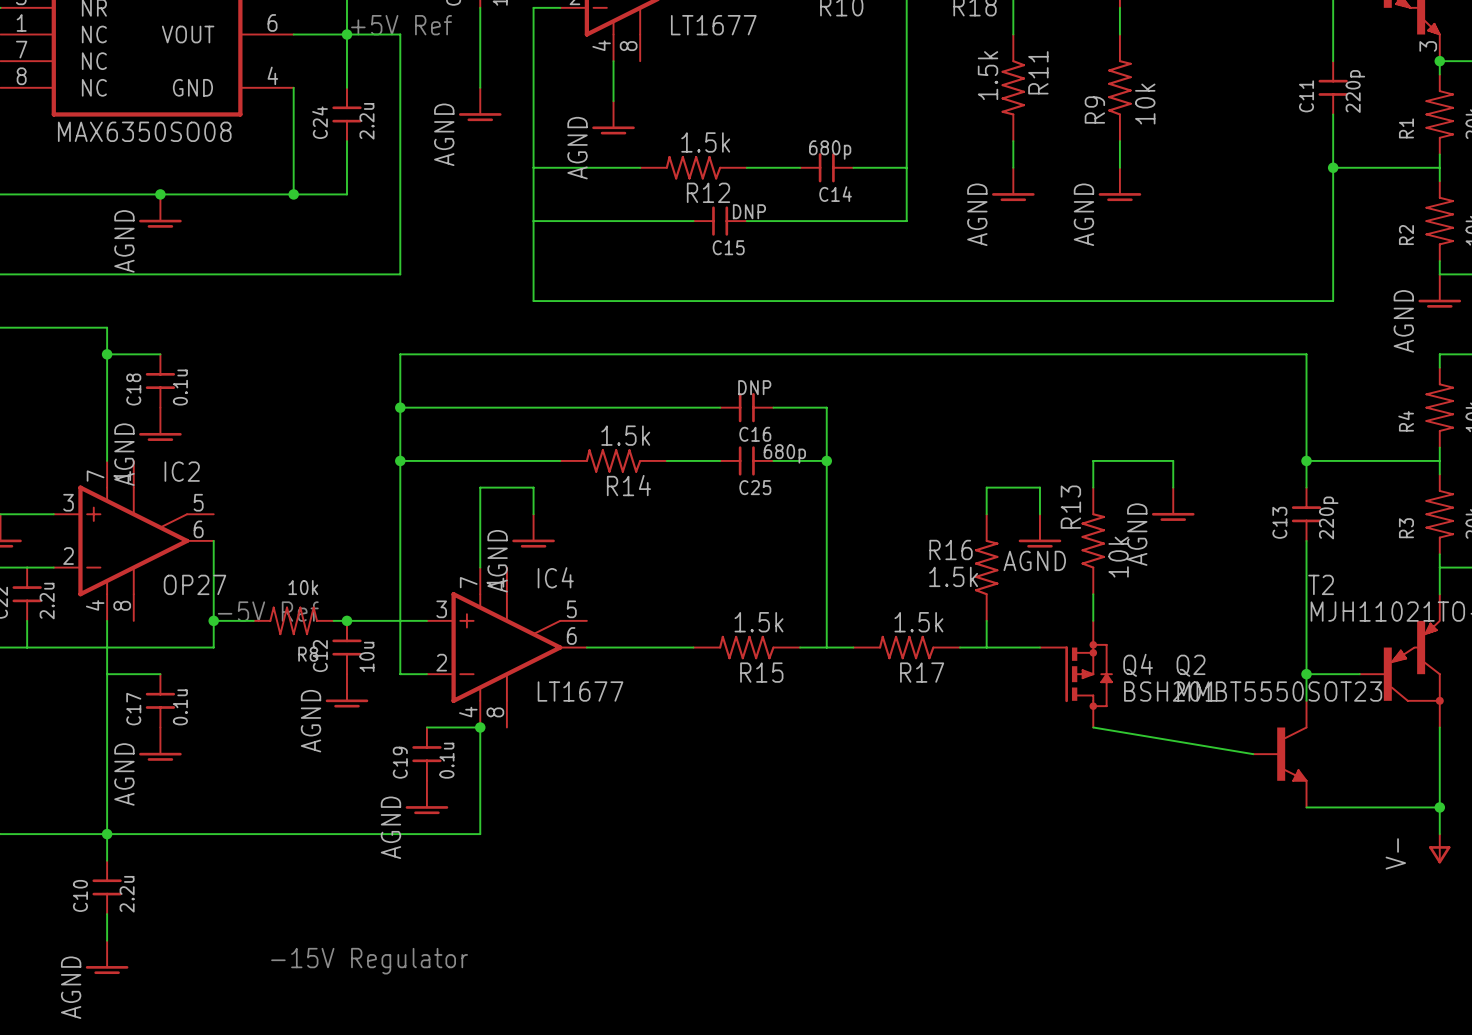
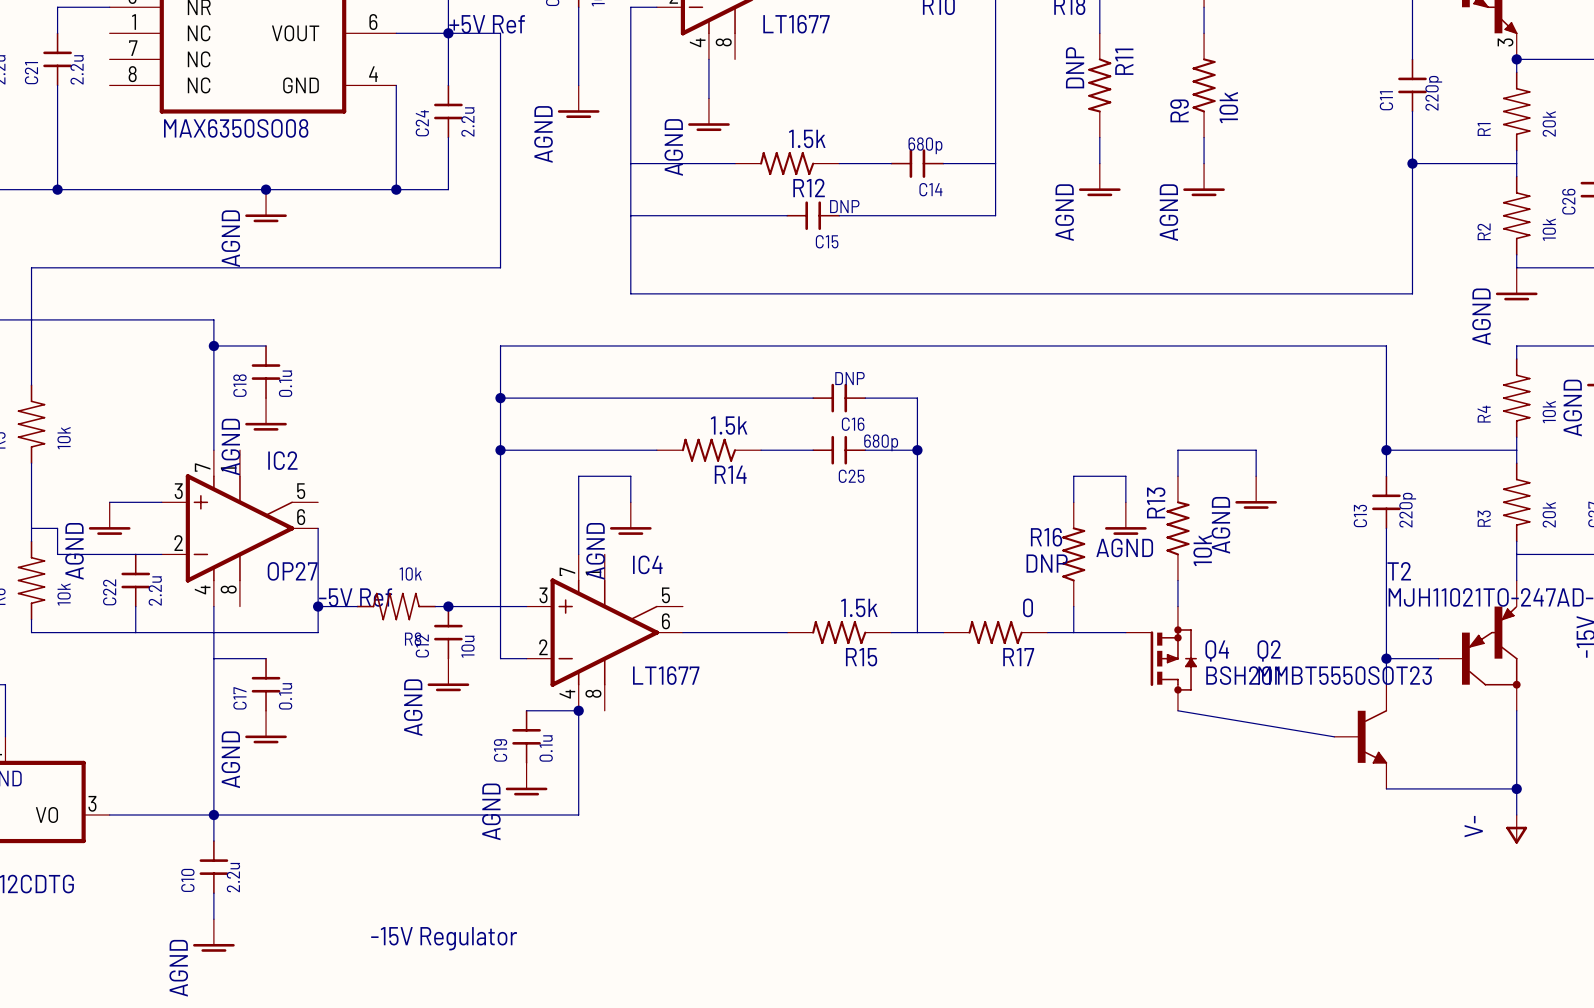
R11 value: 1.5k (988, 75) -> DNP (1075, 67)
R16 value: 1.5k (953, 576) -> DNP (1047, 563)
R17 value: 1.5k (918, 622) -> 0 (1028, 607)

